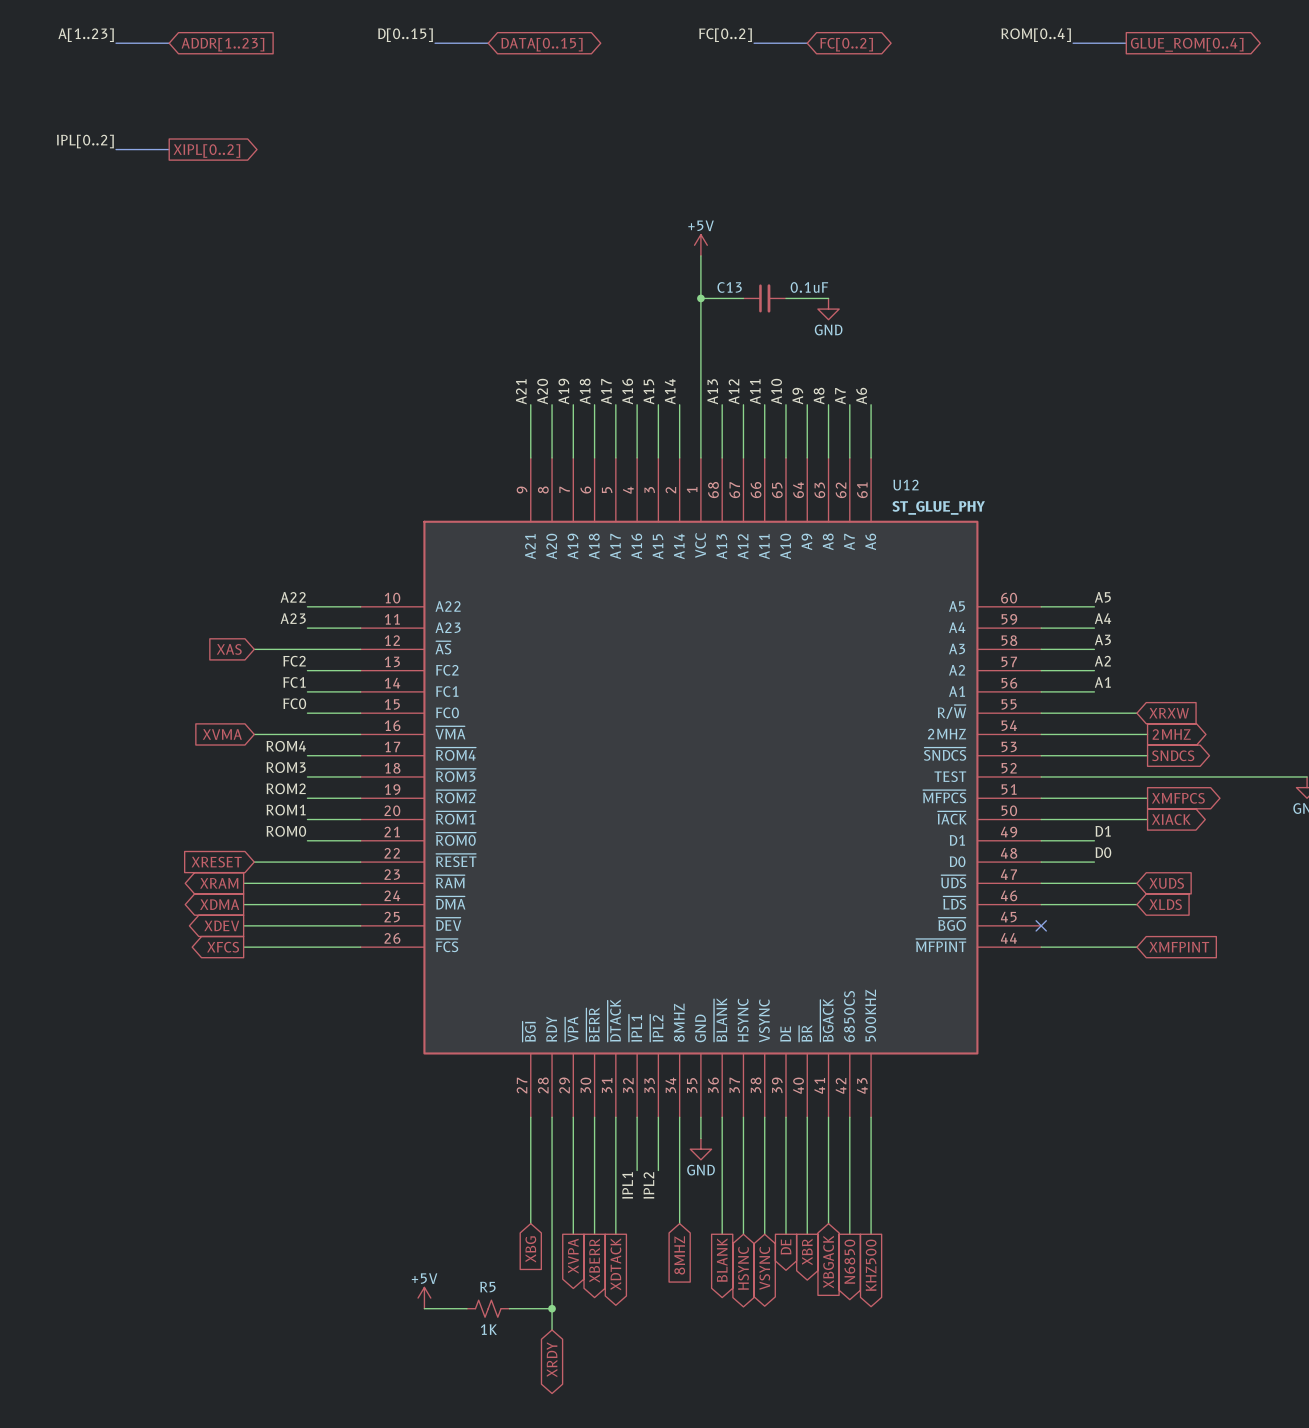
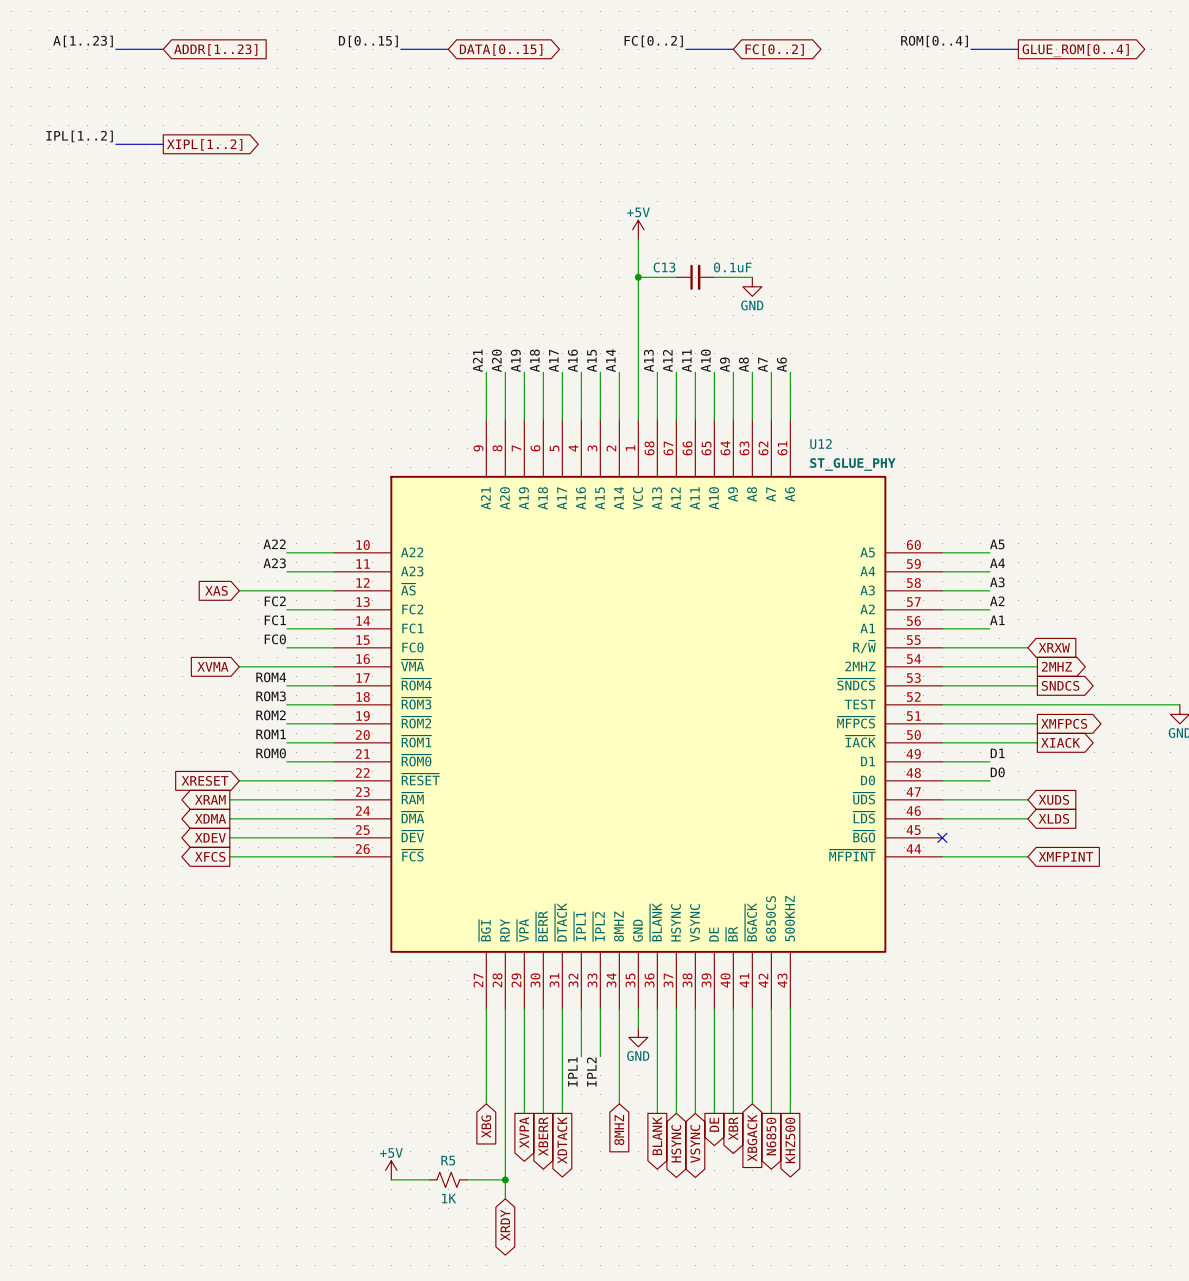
label: IPL[0..2] (85, 141) -> IPL[1..2] (79, 136)
global label: XIPL[0..2] (206, 151) -> XIPL[1..2] (204, 144)

